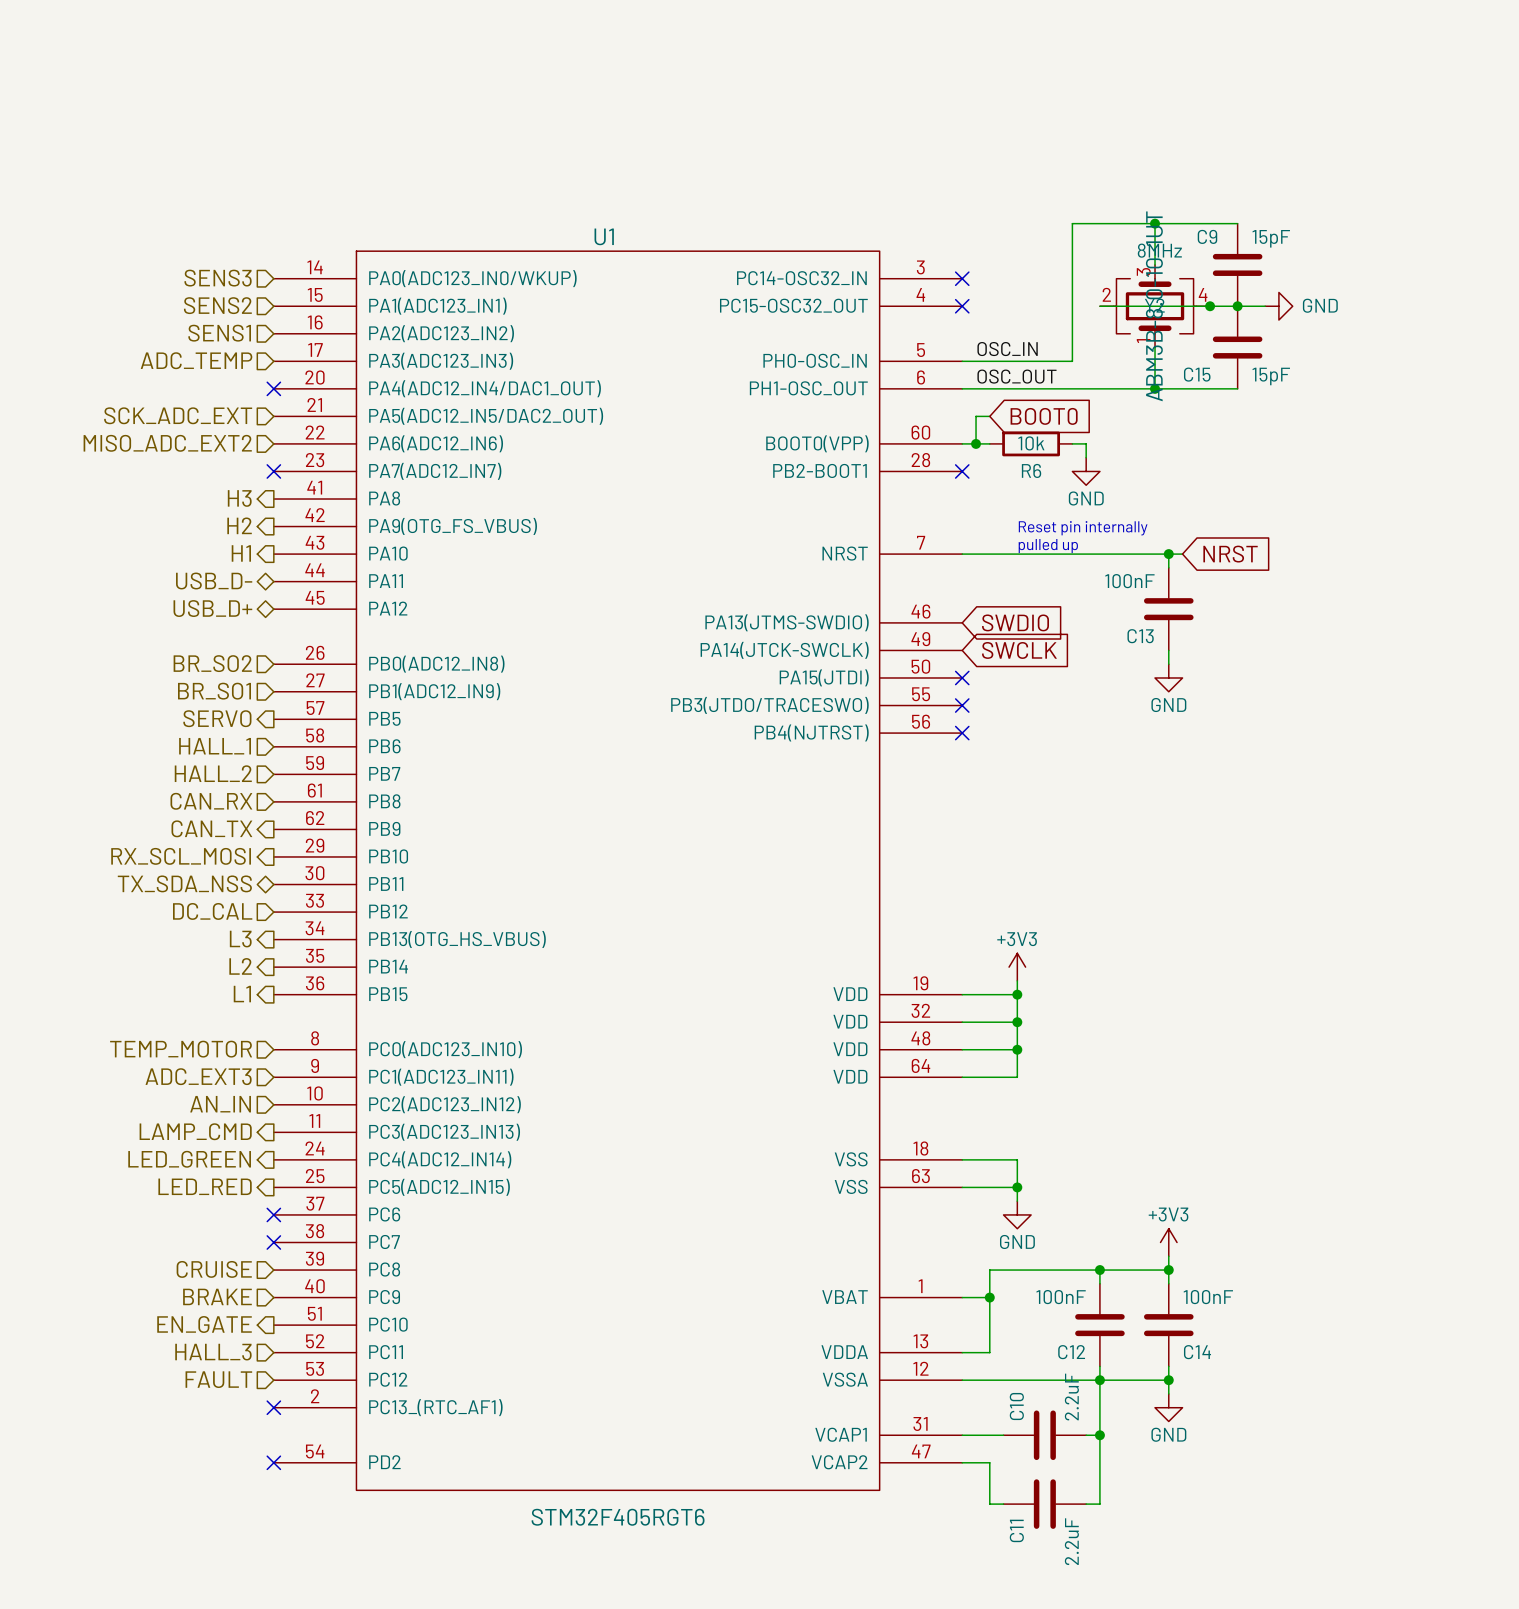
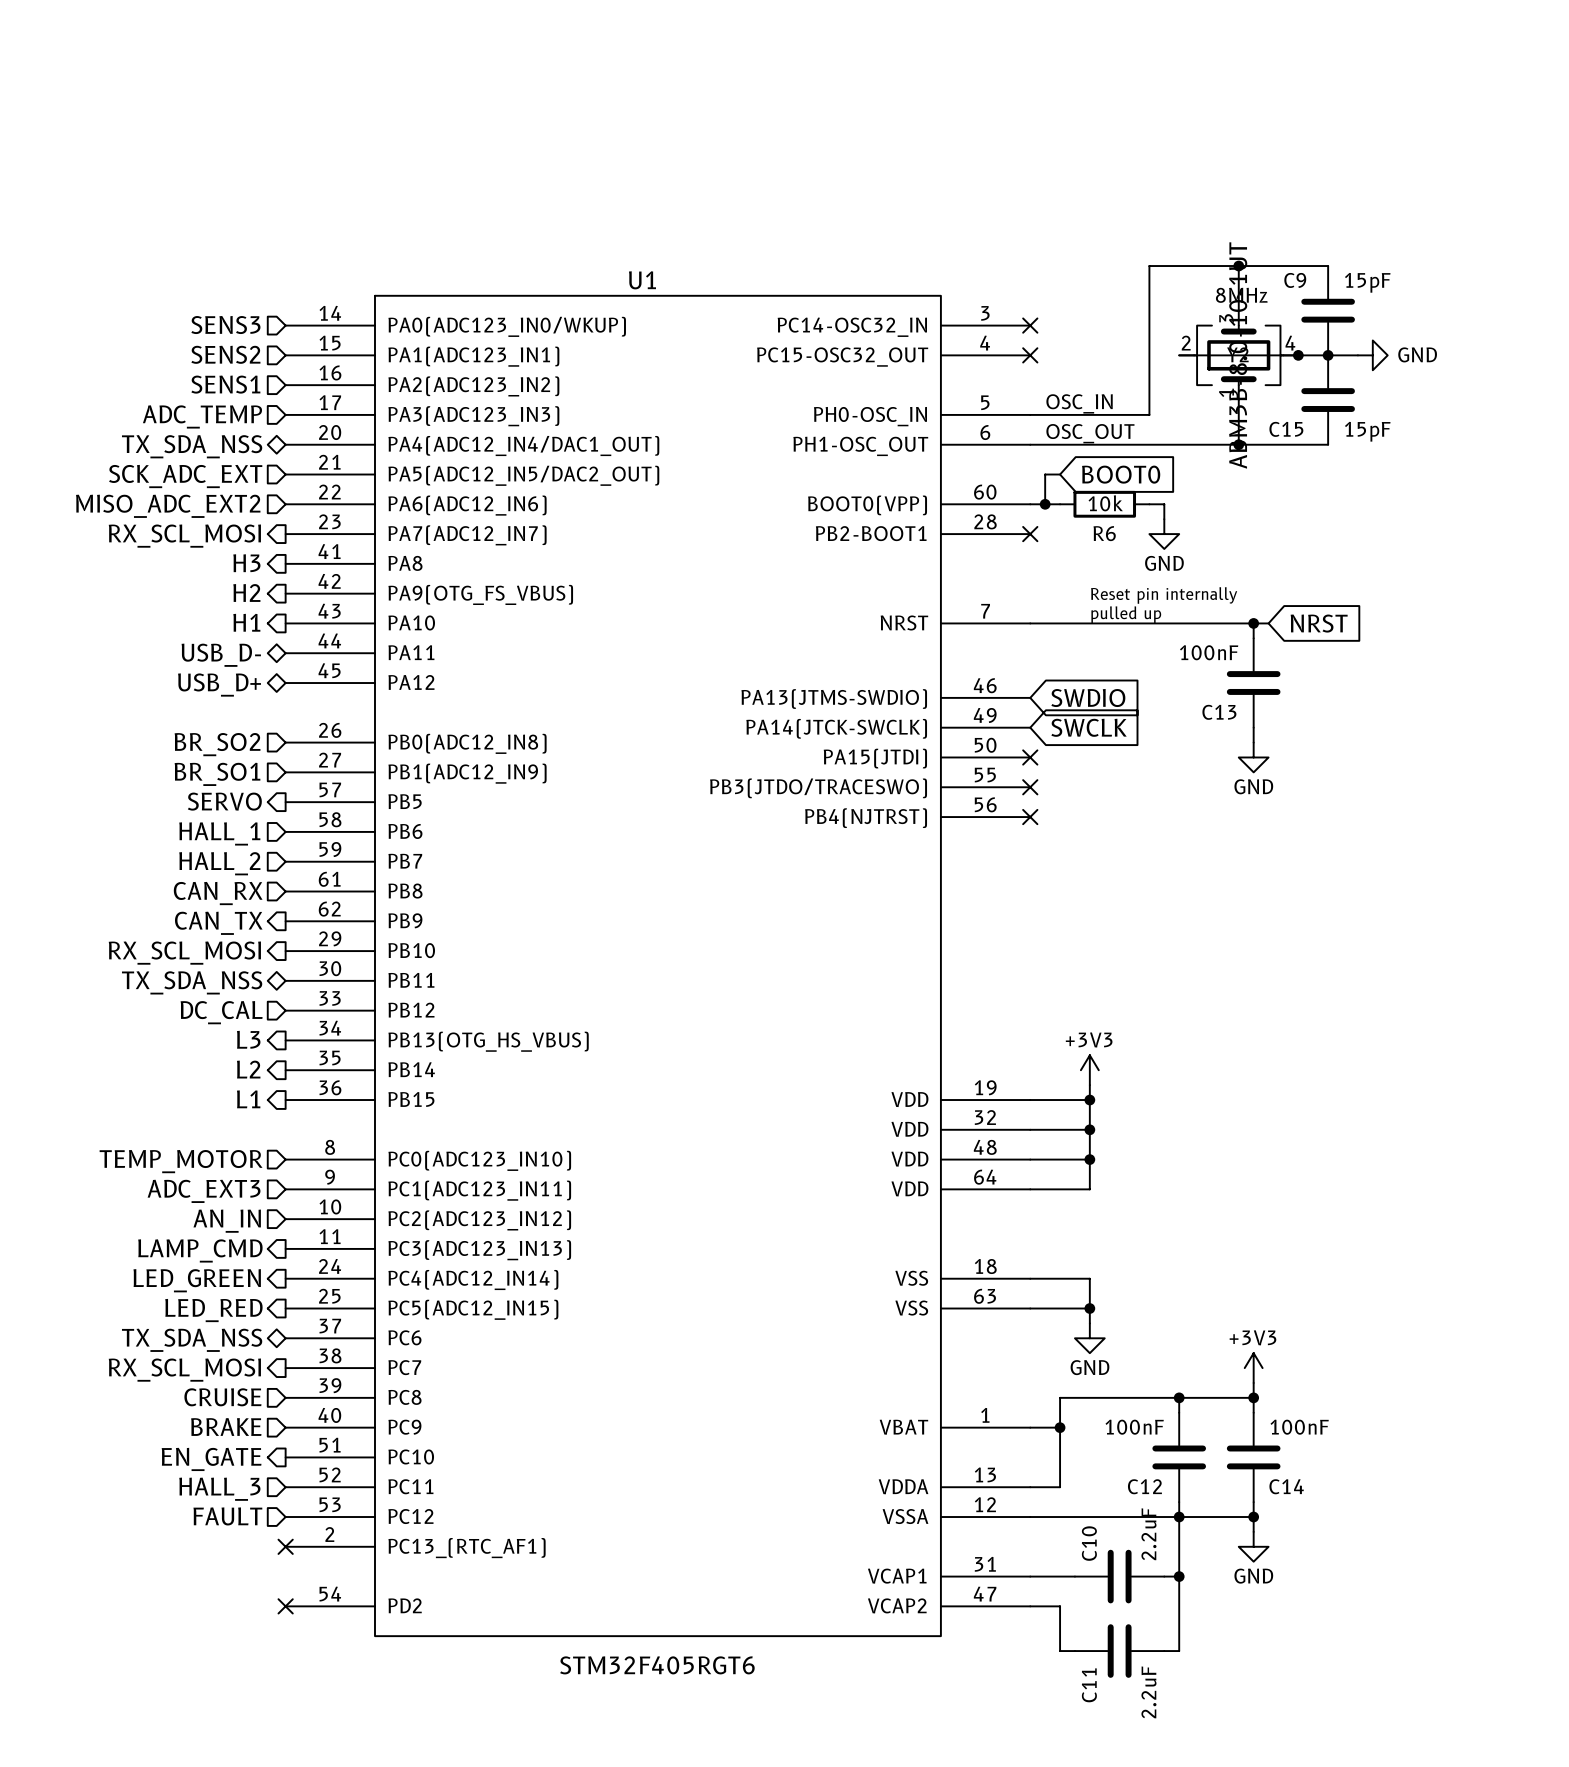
hierarchical label: none -> TX_SDA_NSS (192, 446)
no-connect mark: (273, 388) -> none
hierarchical label: none -> RX_SCL_MOSI (184, 536)
no-connect mark: (273, 471) -> none
hierarchical label: none -> TX_SDA_NSS (192, 1340)
no-connect mark: (273, 1214) -> none
hierarchical label: none -> RX_SCL_MOSI (184, 1370)
no-connect mark: (273, 1242) -> none

